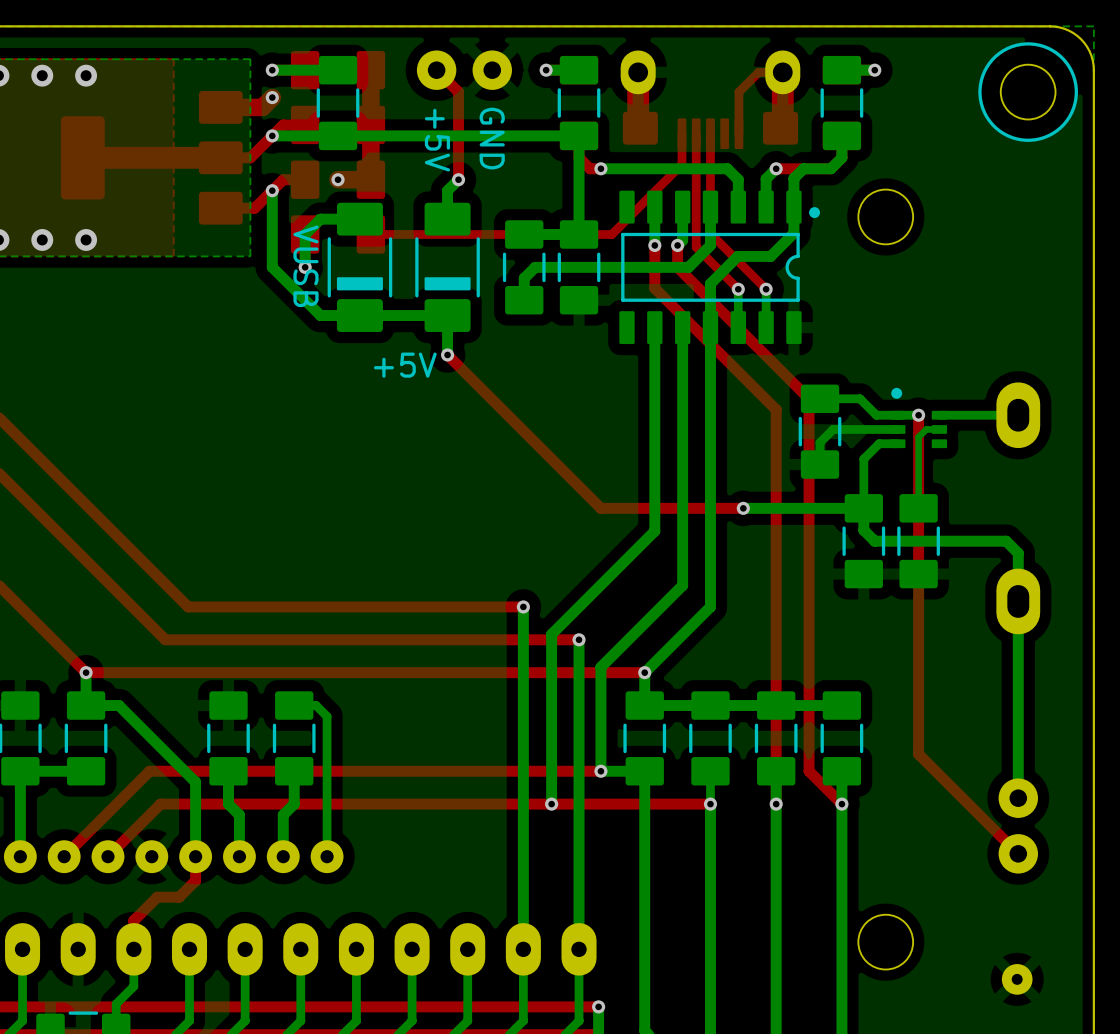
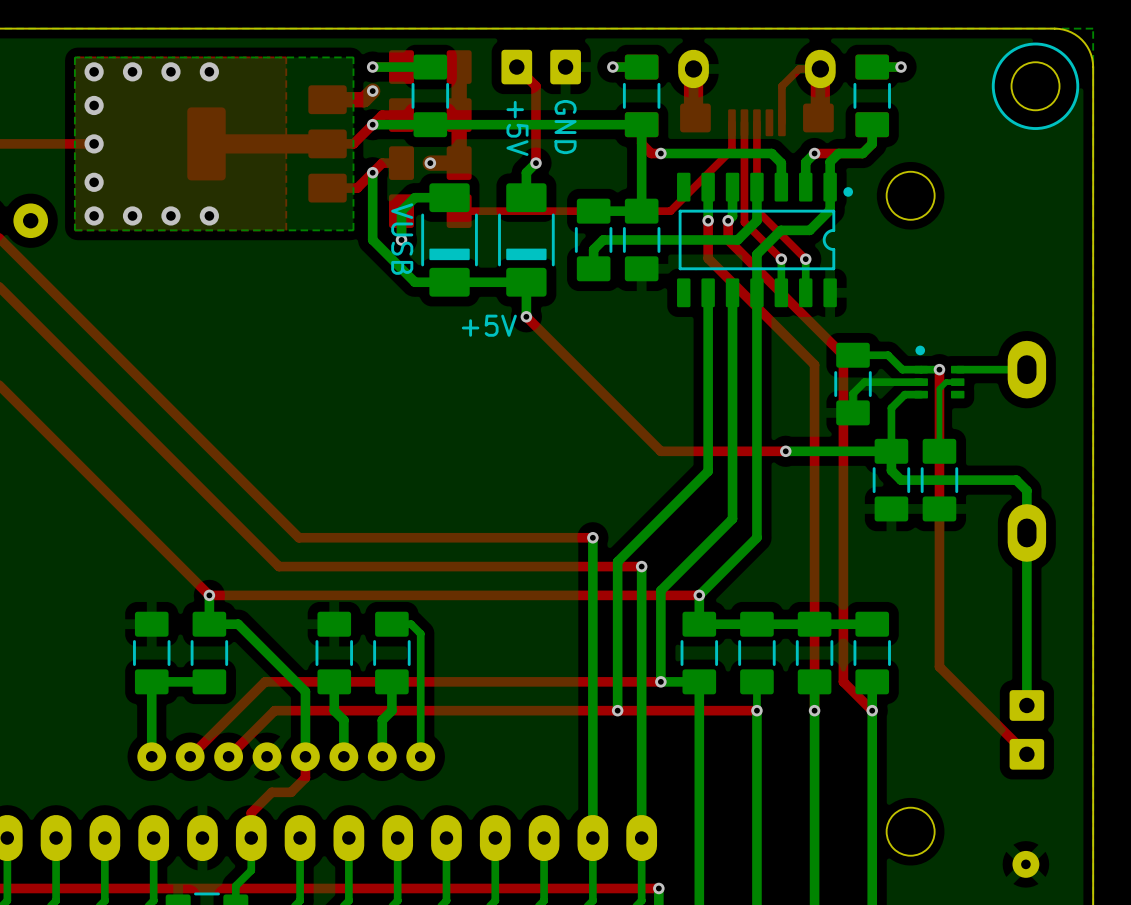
part footprint: [416, 50, 512, 90] -> [501, 49, 581, 85]
part footprint: [998, 778, 1039, 874] -> [1009, 690, 1045, 770]

